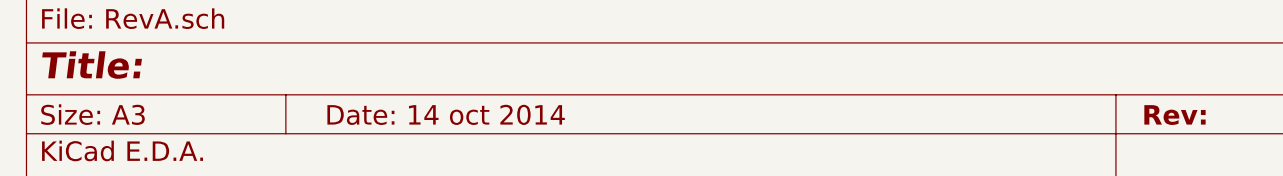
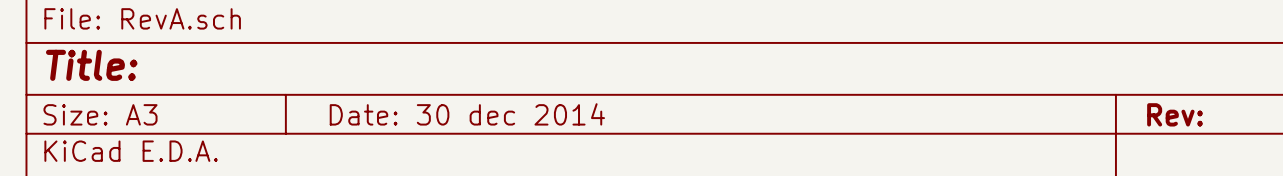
title block: Date: 14 oct 2014 (446, 114) -> Date: 30 dec 2014 (467, 114)

